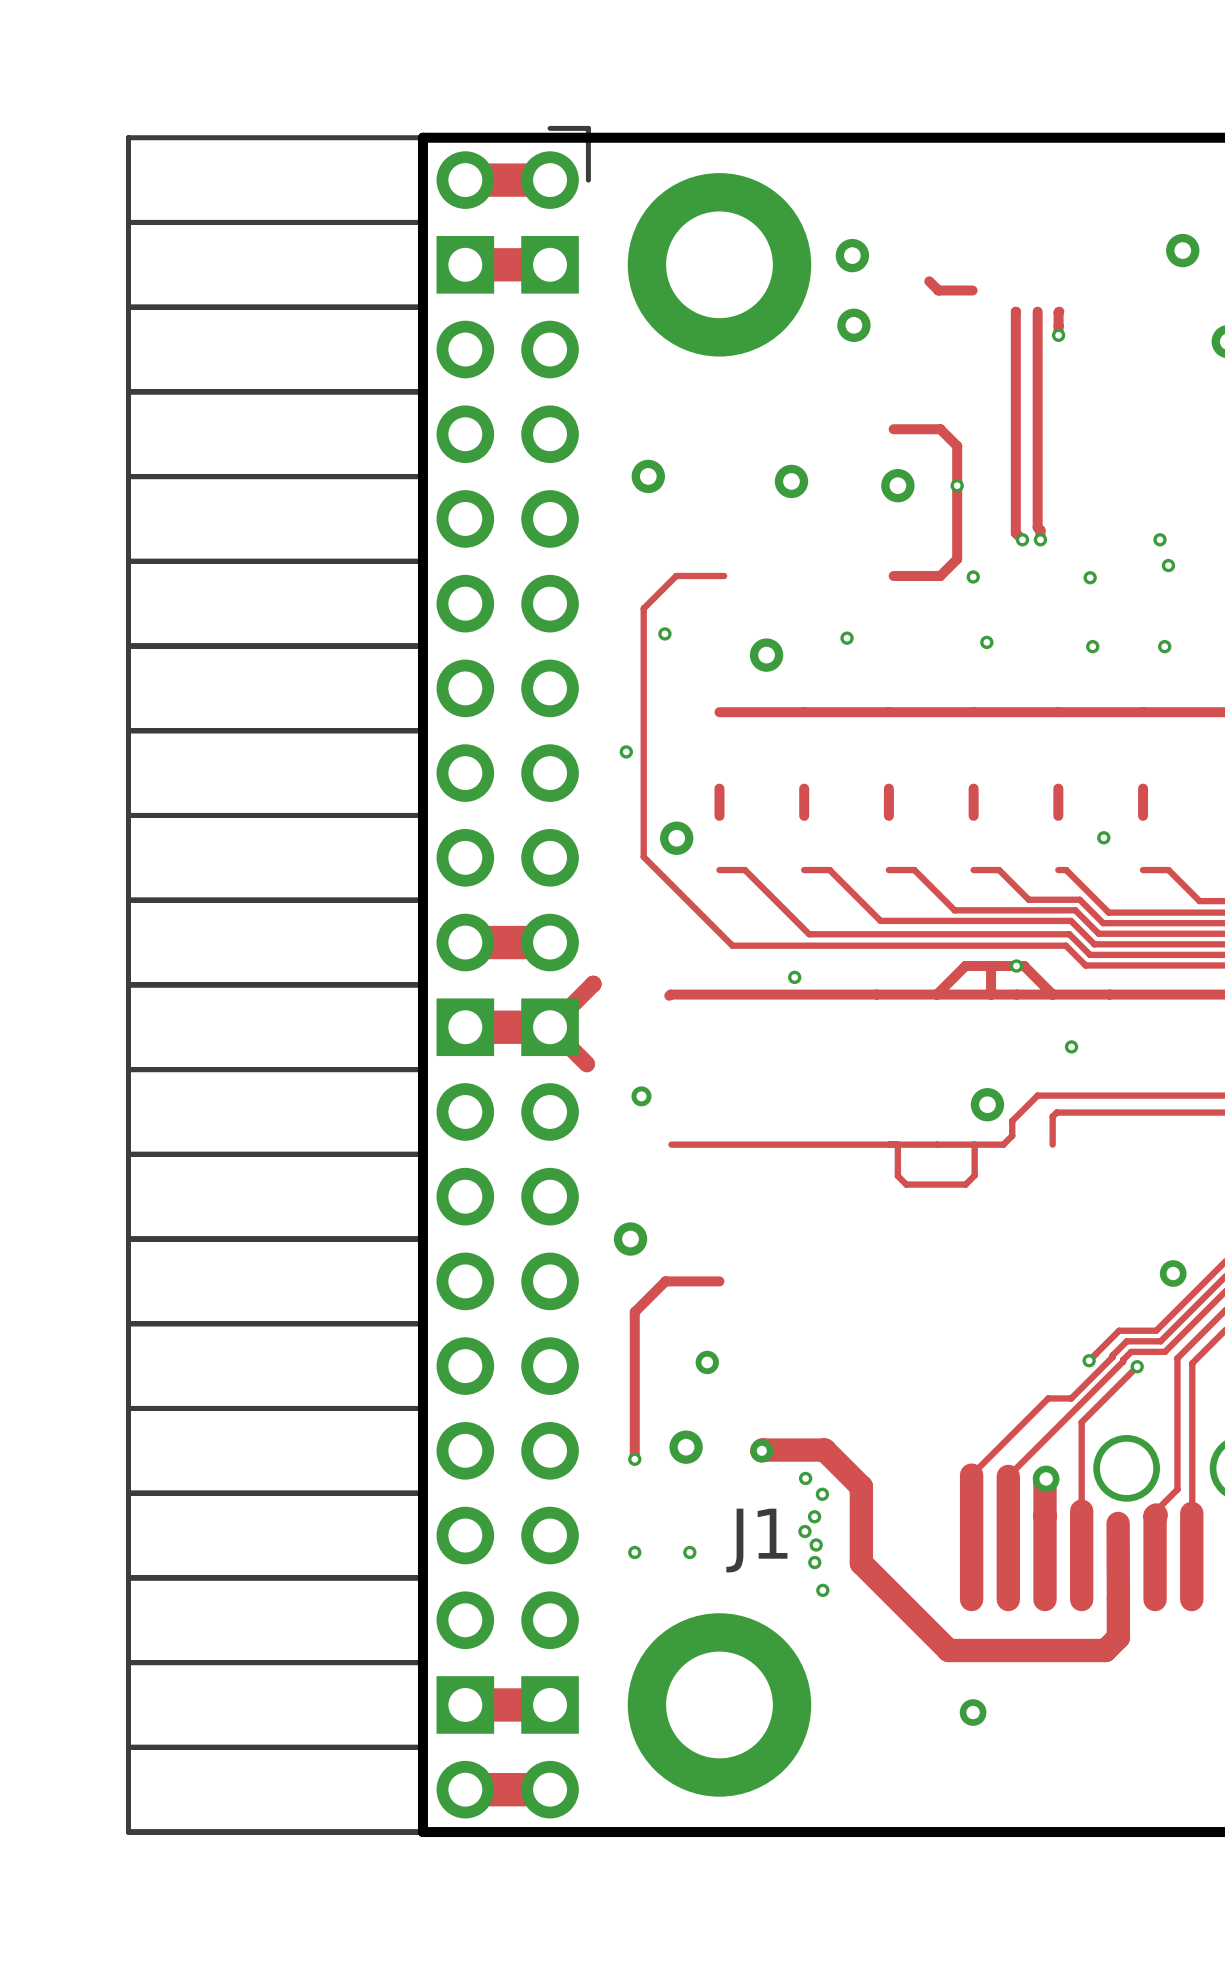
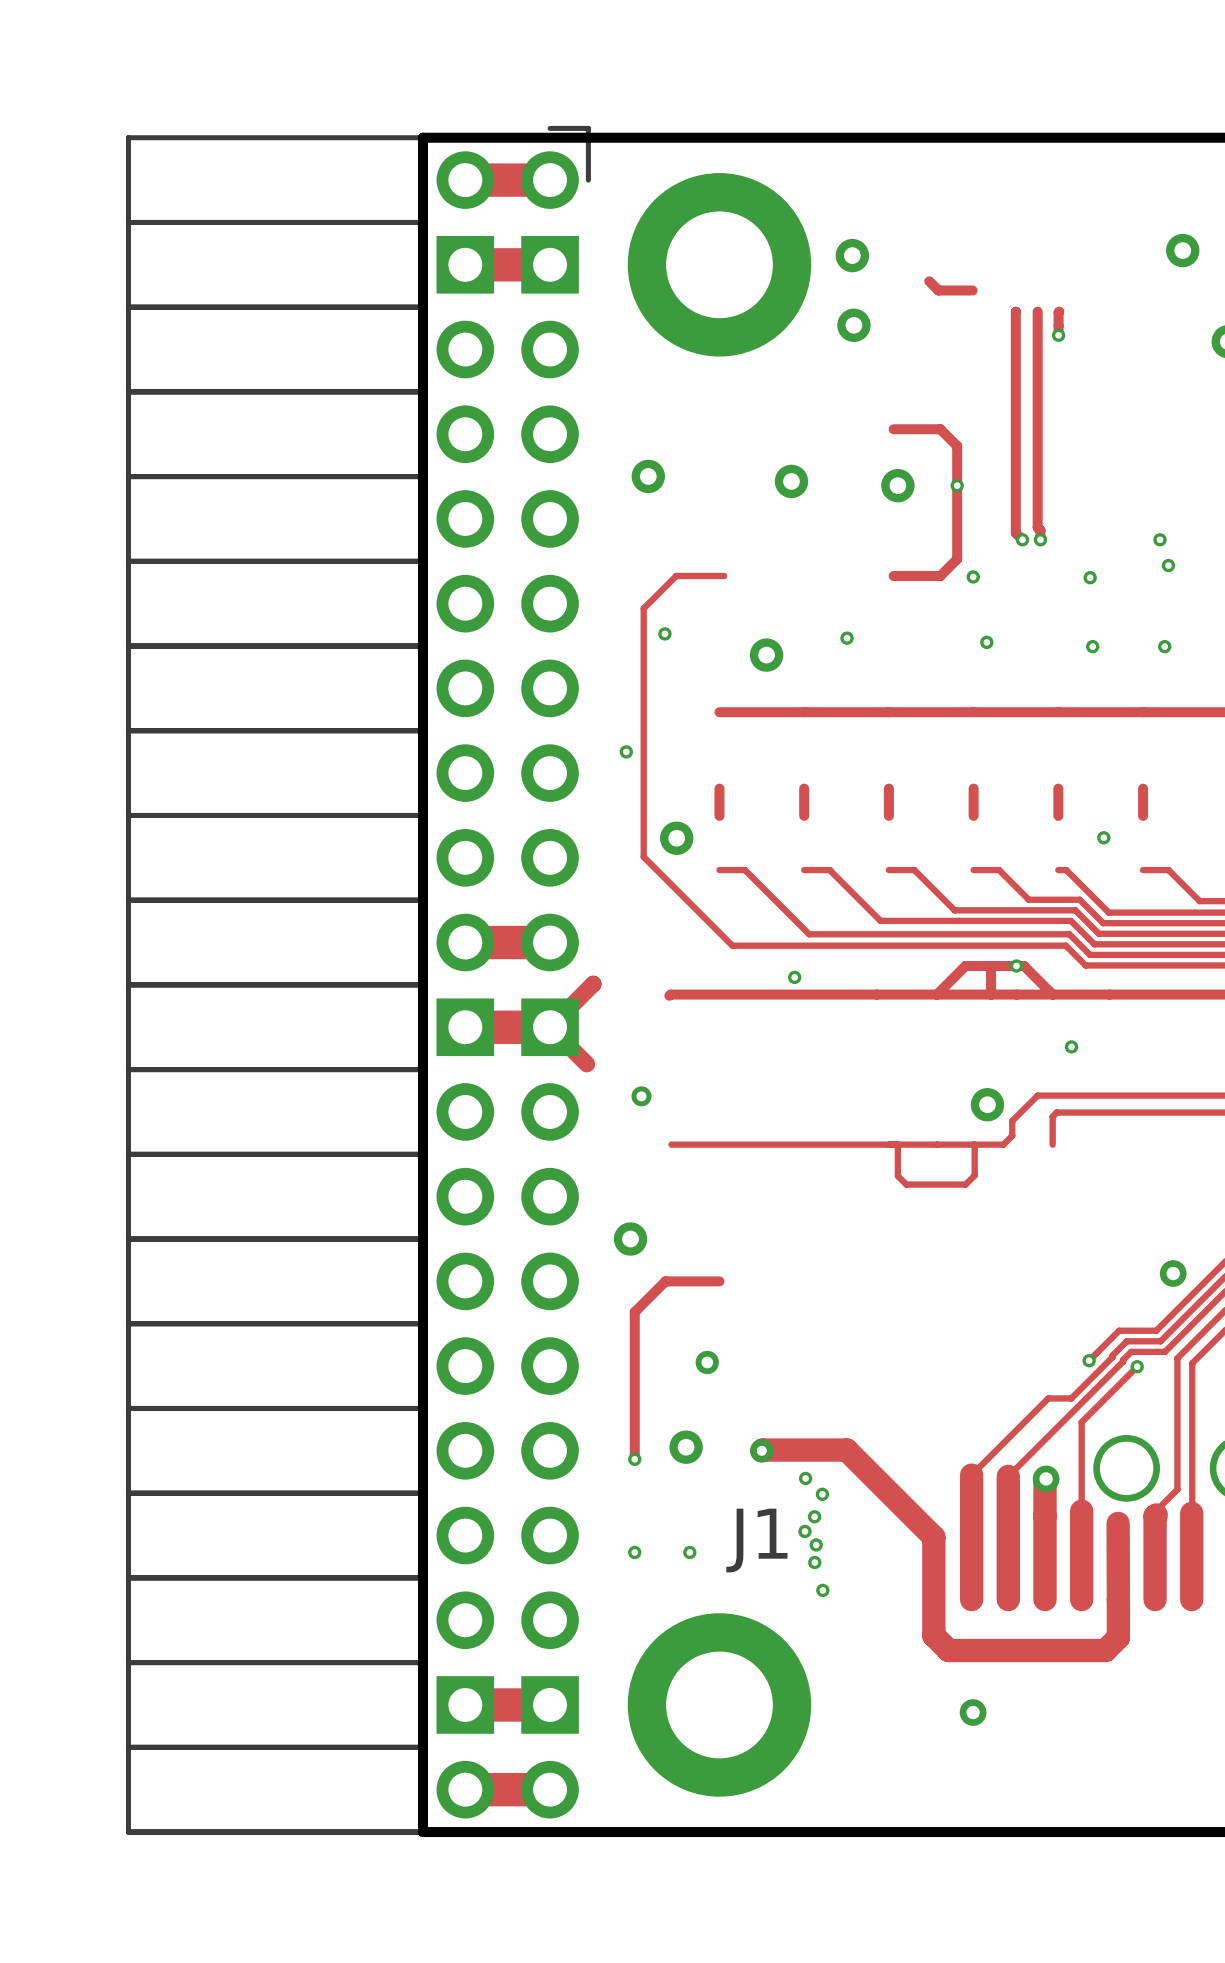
track: (824, 1450) (861, 1486) (861, 1563) (933, 1635) -> (824, 1450) (846, 1450) (933, 1537) (933, 1635)

